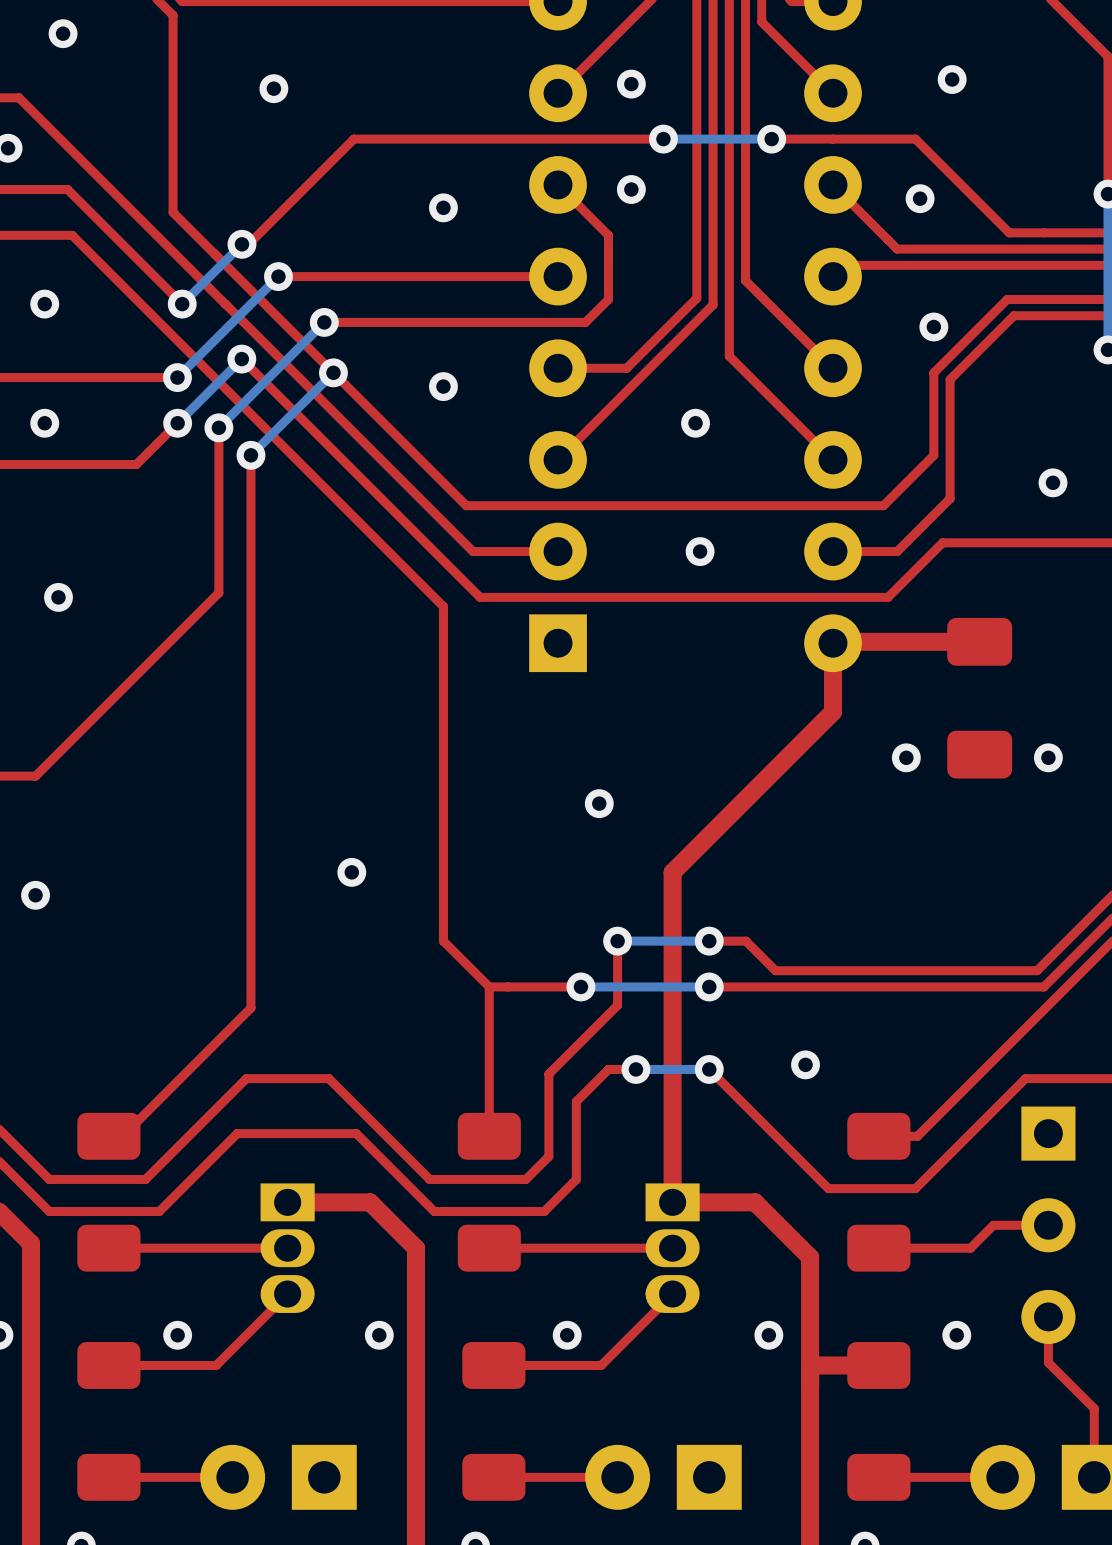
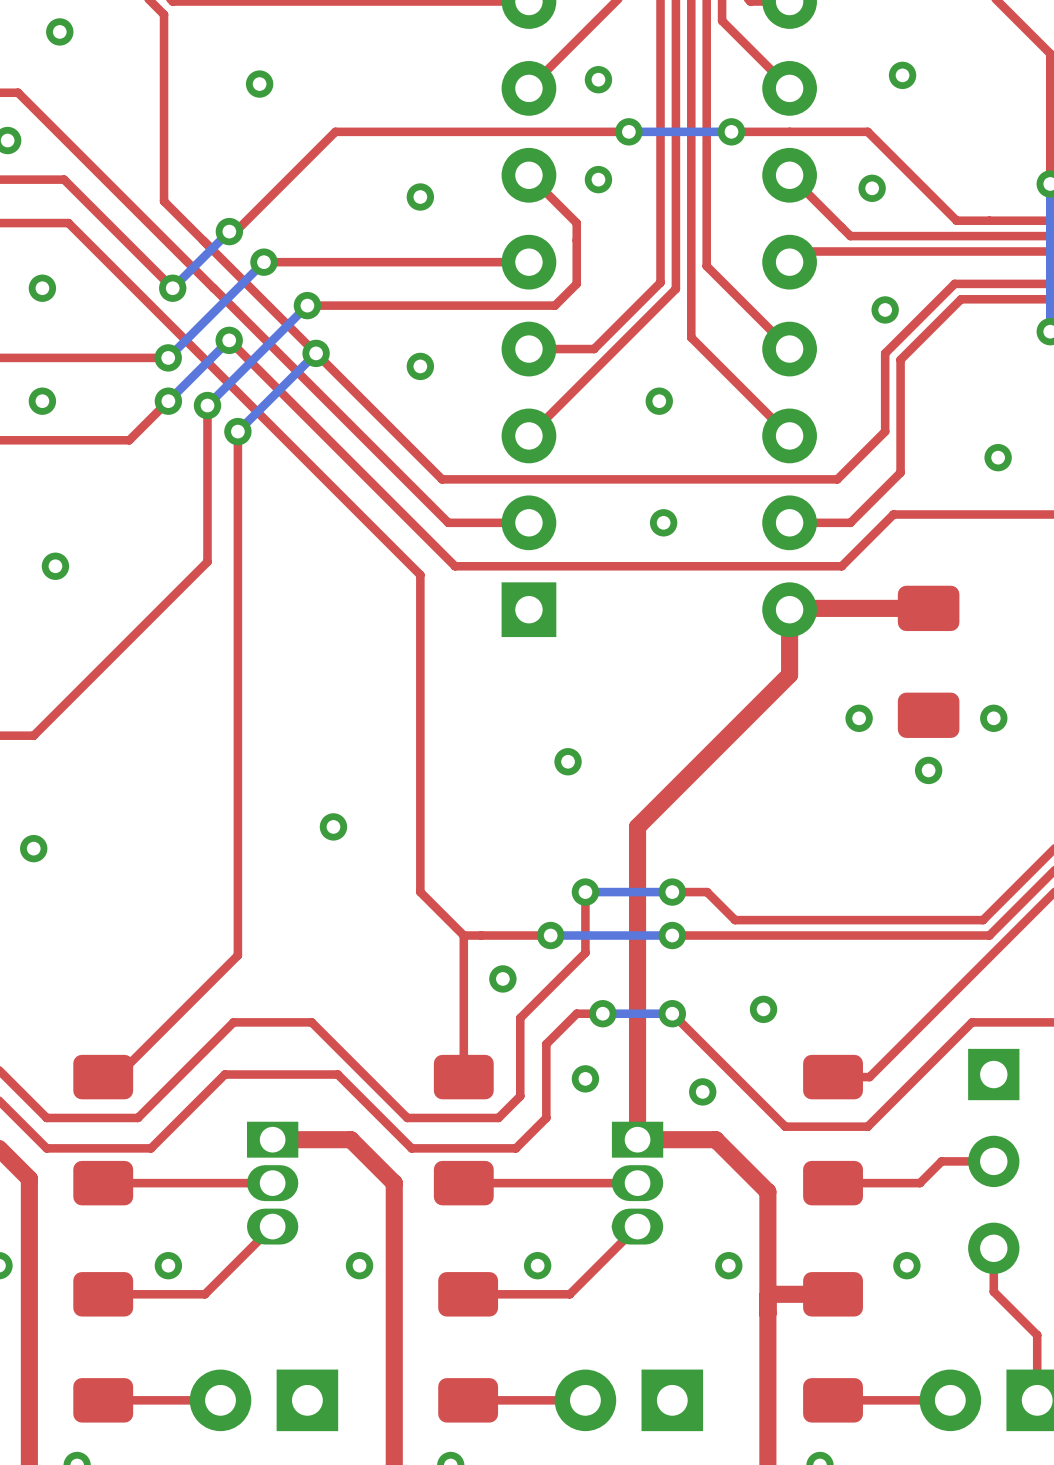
via: none -> (928, 770)
via: none -> (502, 978)
via: none -> (585, 1078)
via: none -> (702, 1091)

